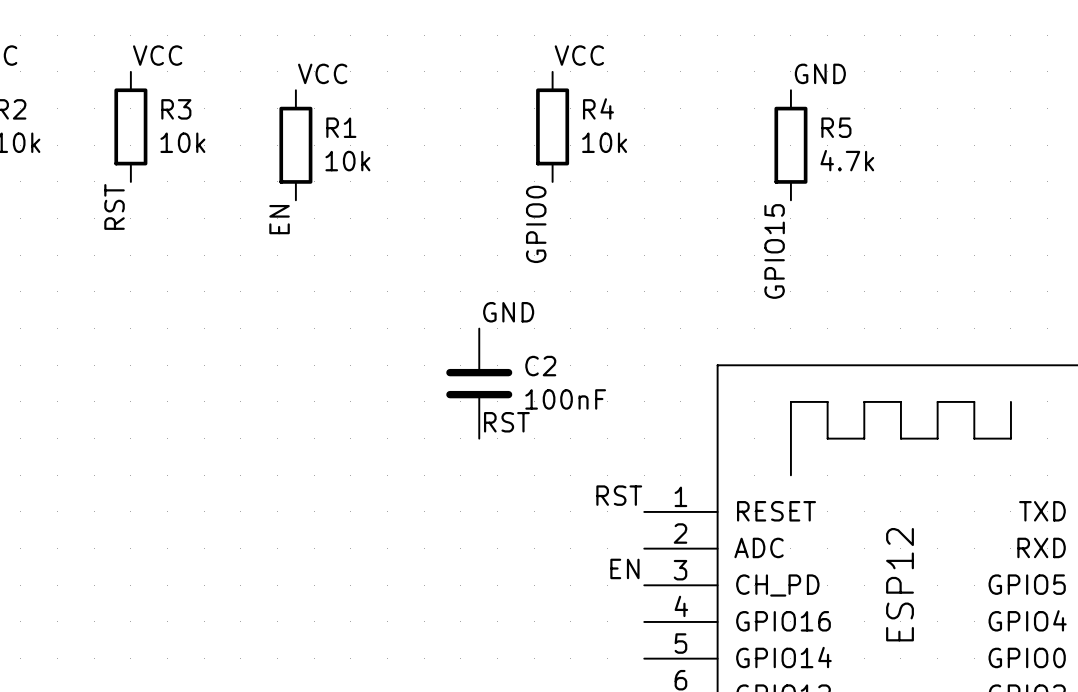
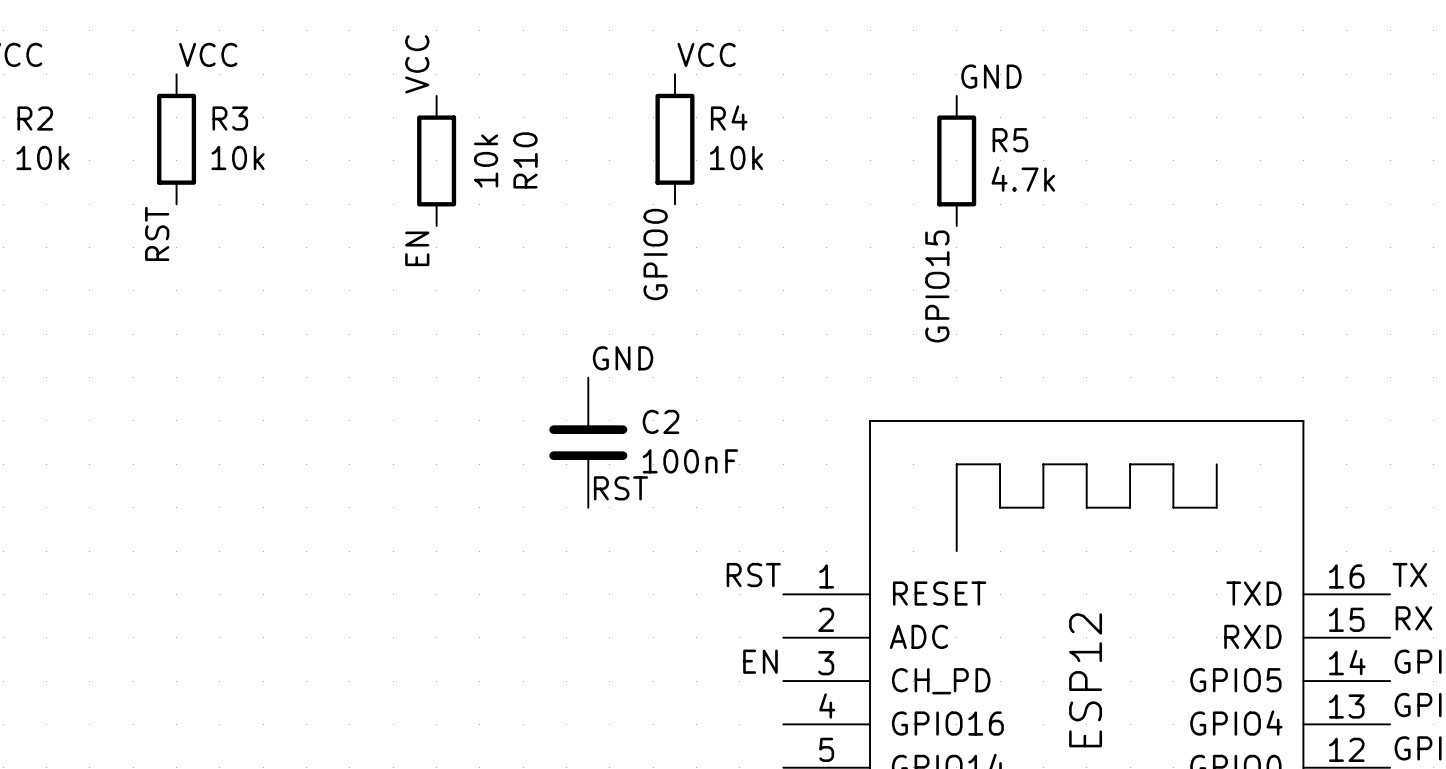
label rotation: 0° (322, 73) -> 90° counterclockwise (417, 64)
R1: 10k (295, 145) -> none
R10: none -> 10k (436, 160)
label position: EN (279, 219) -> EN (417, 248)

